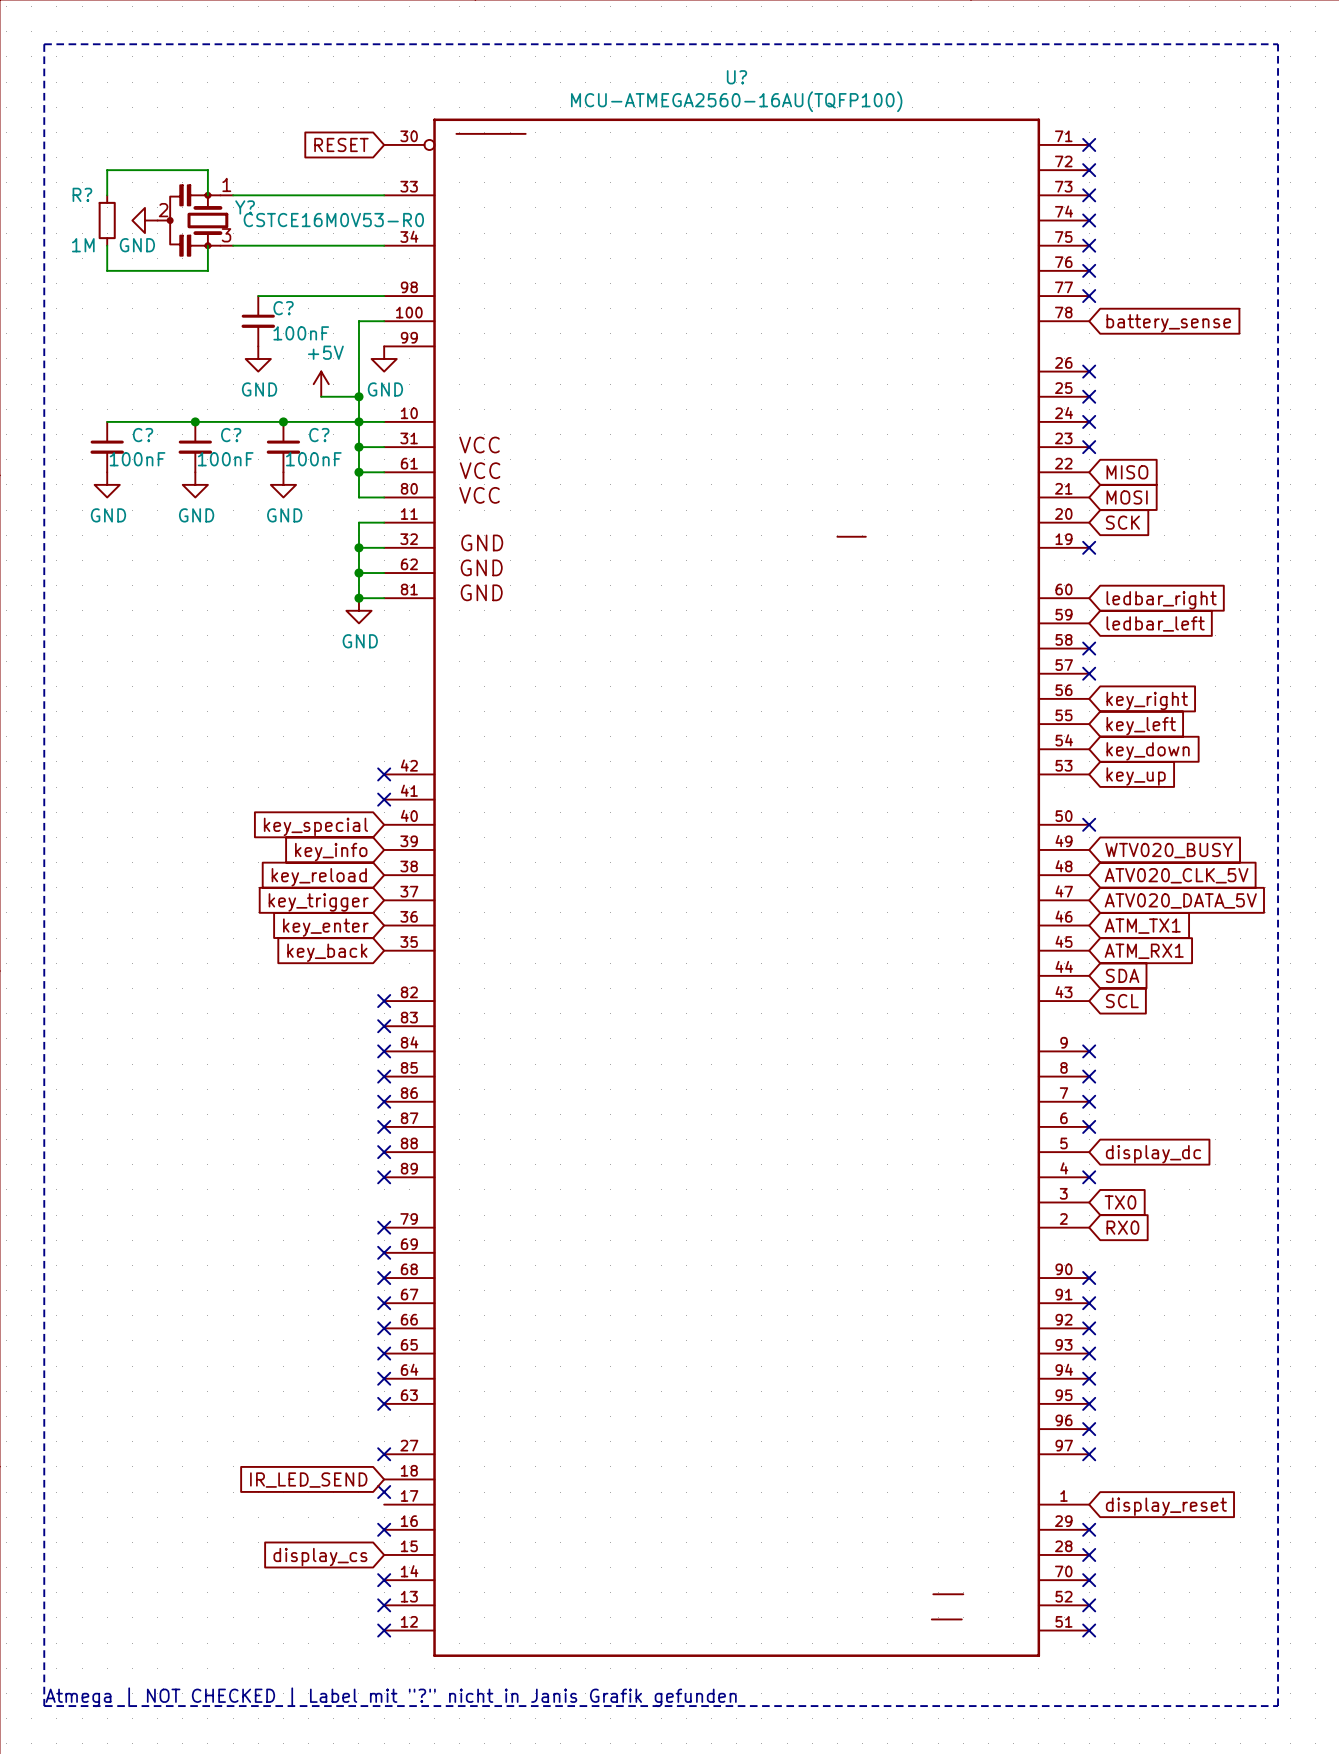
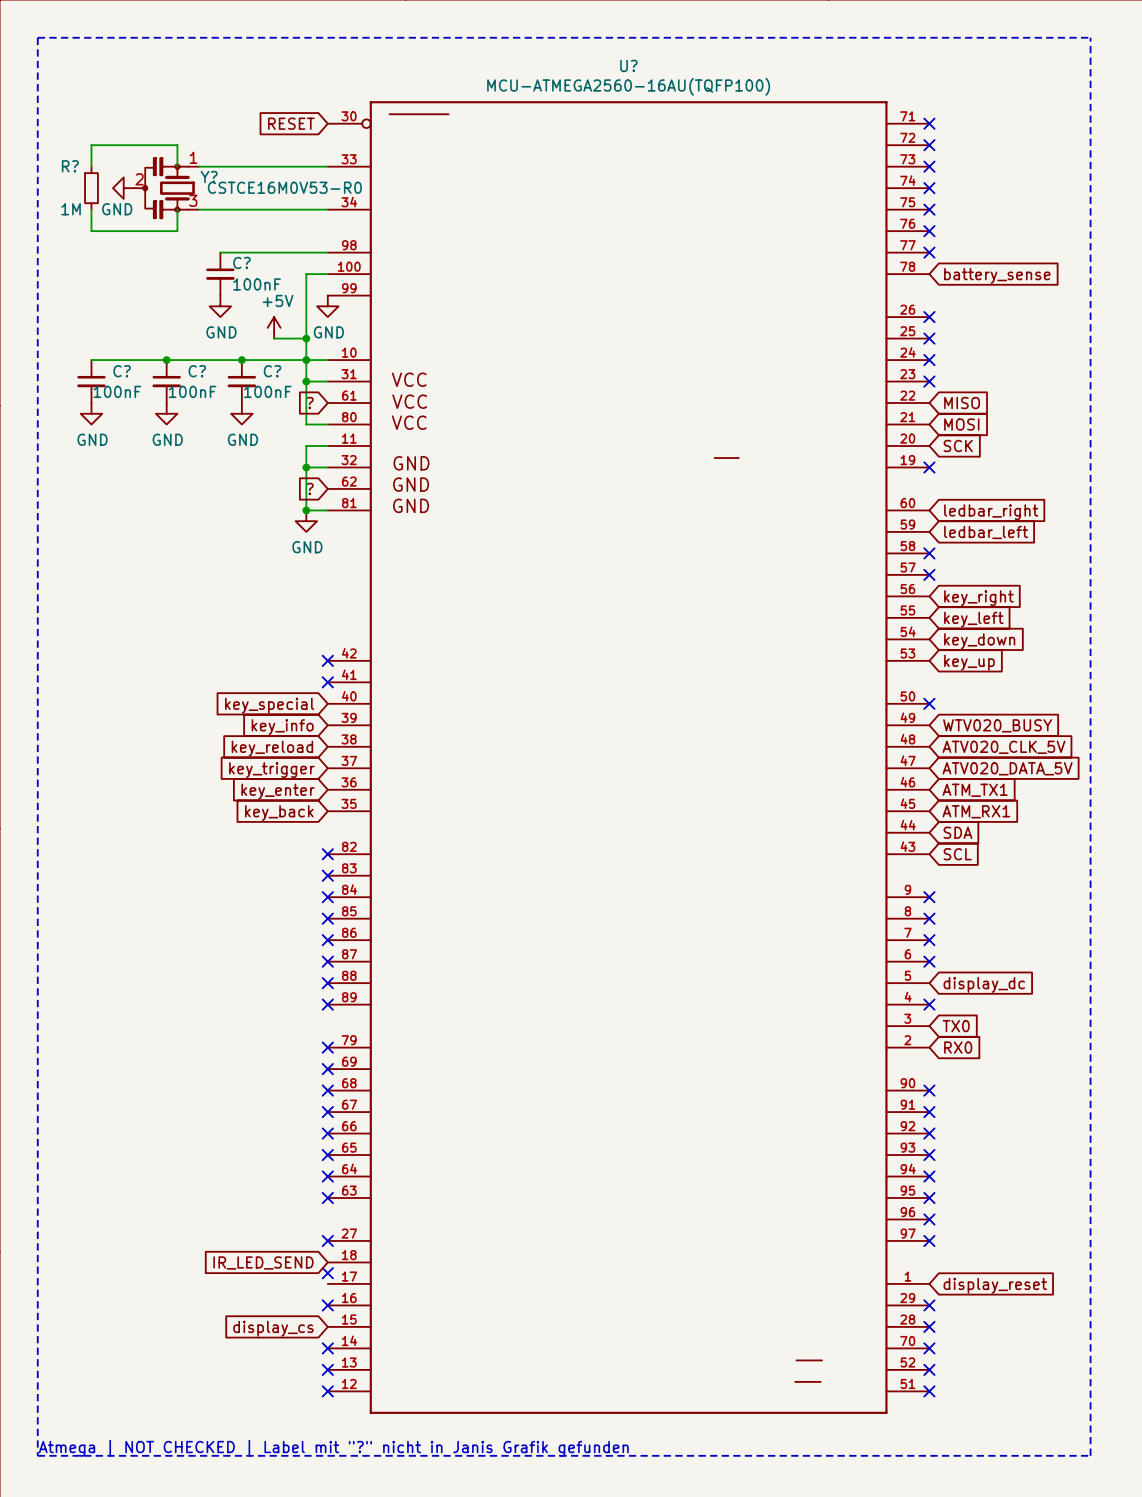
wire: (358, 472) (384, 472) -> none
junction: (358, 472) -> none
global label: none -> ? (310, 403)
wire: (358, 573) (384, 573) -> none
junction: (358, 573) -> none
global label: none -> ? (310, 488)

